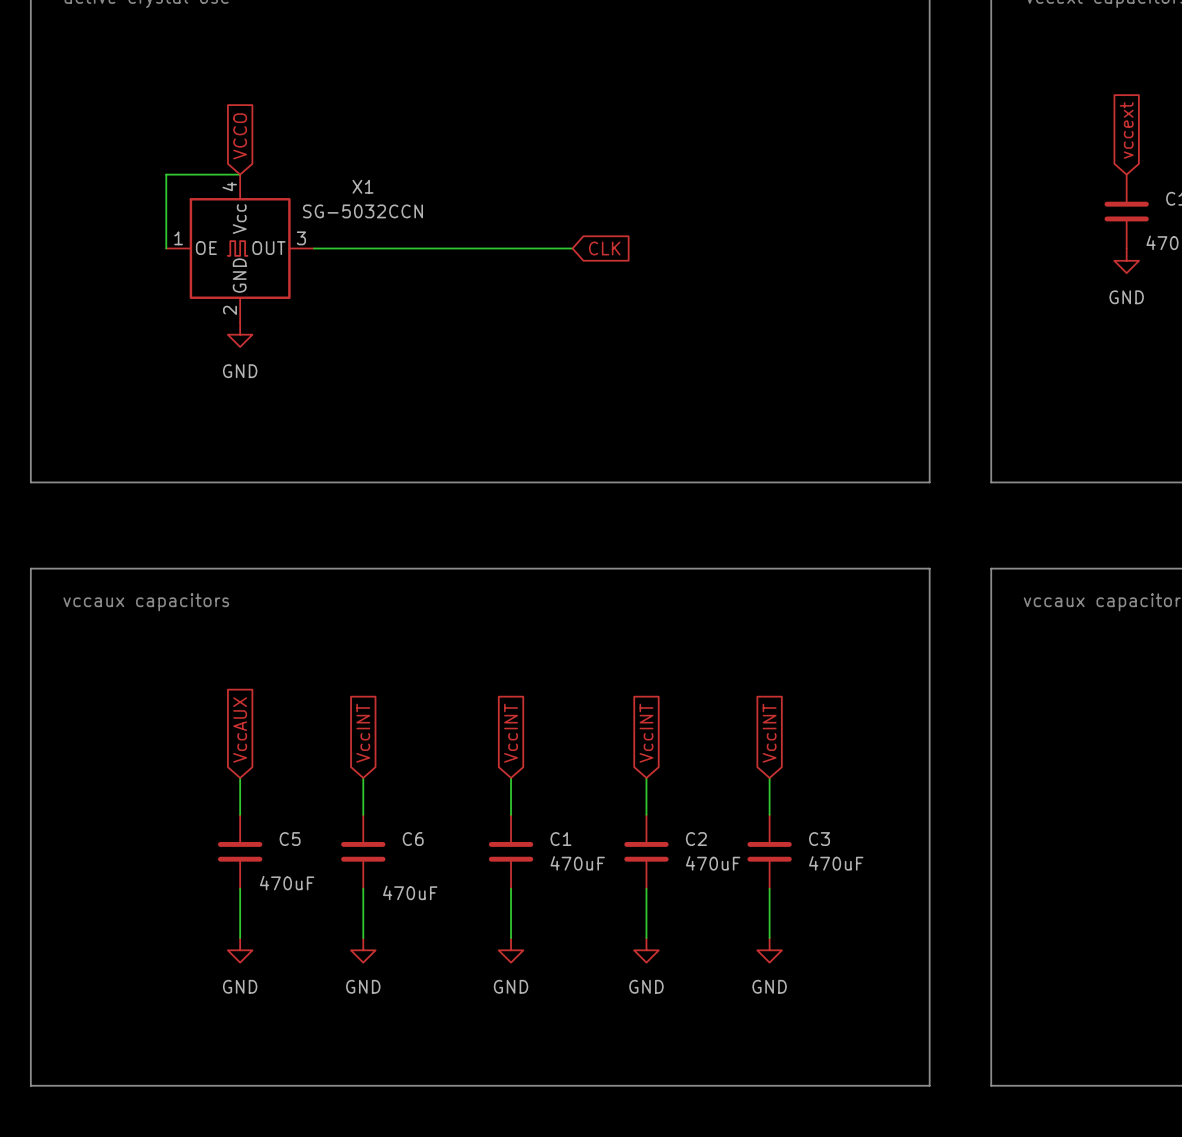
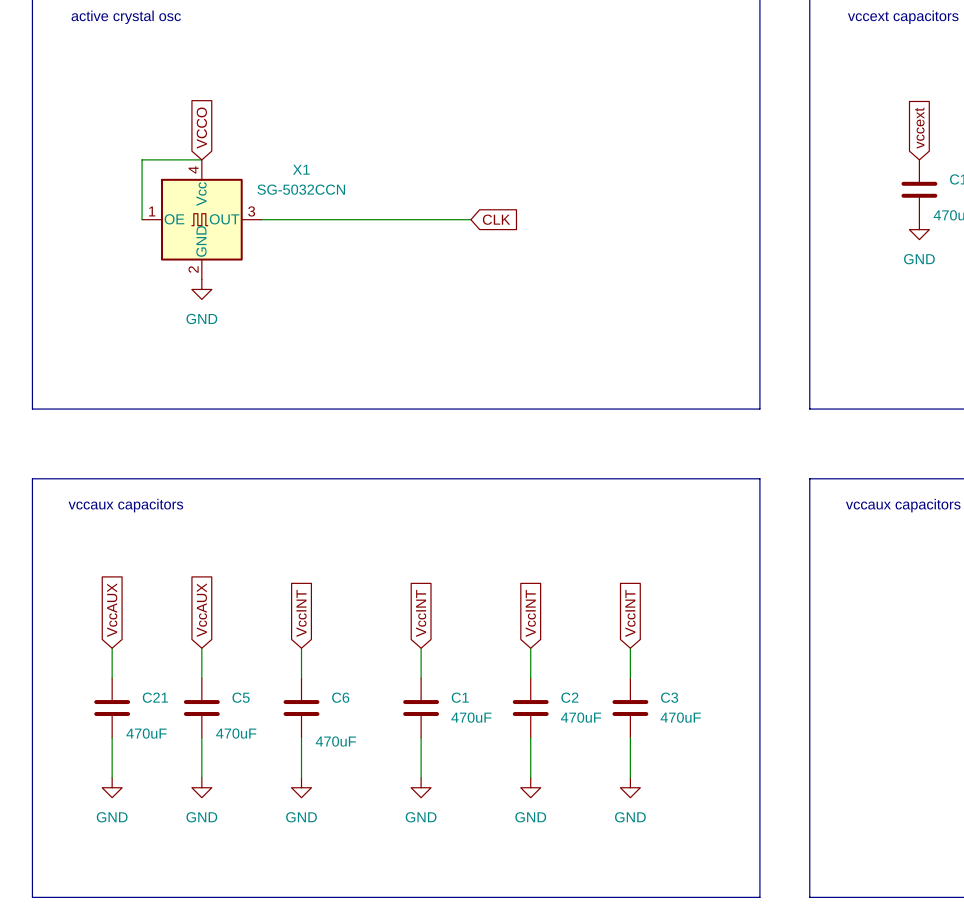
global label: none -> VccAUX (112, 610)
wire: none -> (112, 648) (112, 678)
C21: none -> 470uF (112, 708)
wire: none -> (112, 737) (112, 777)
power symbol: none -> GND (112, 787)

